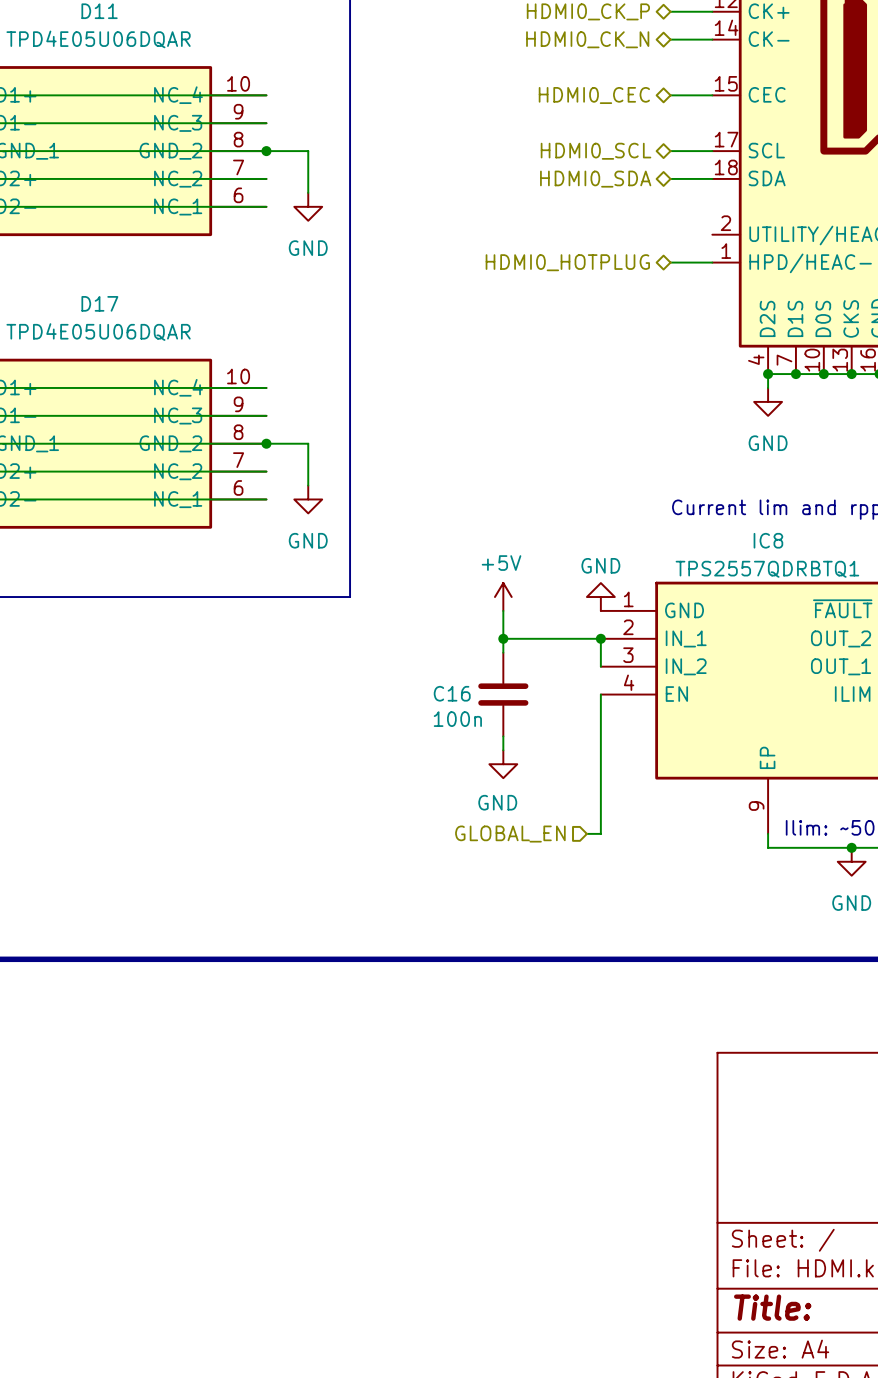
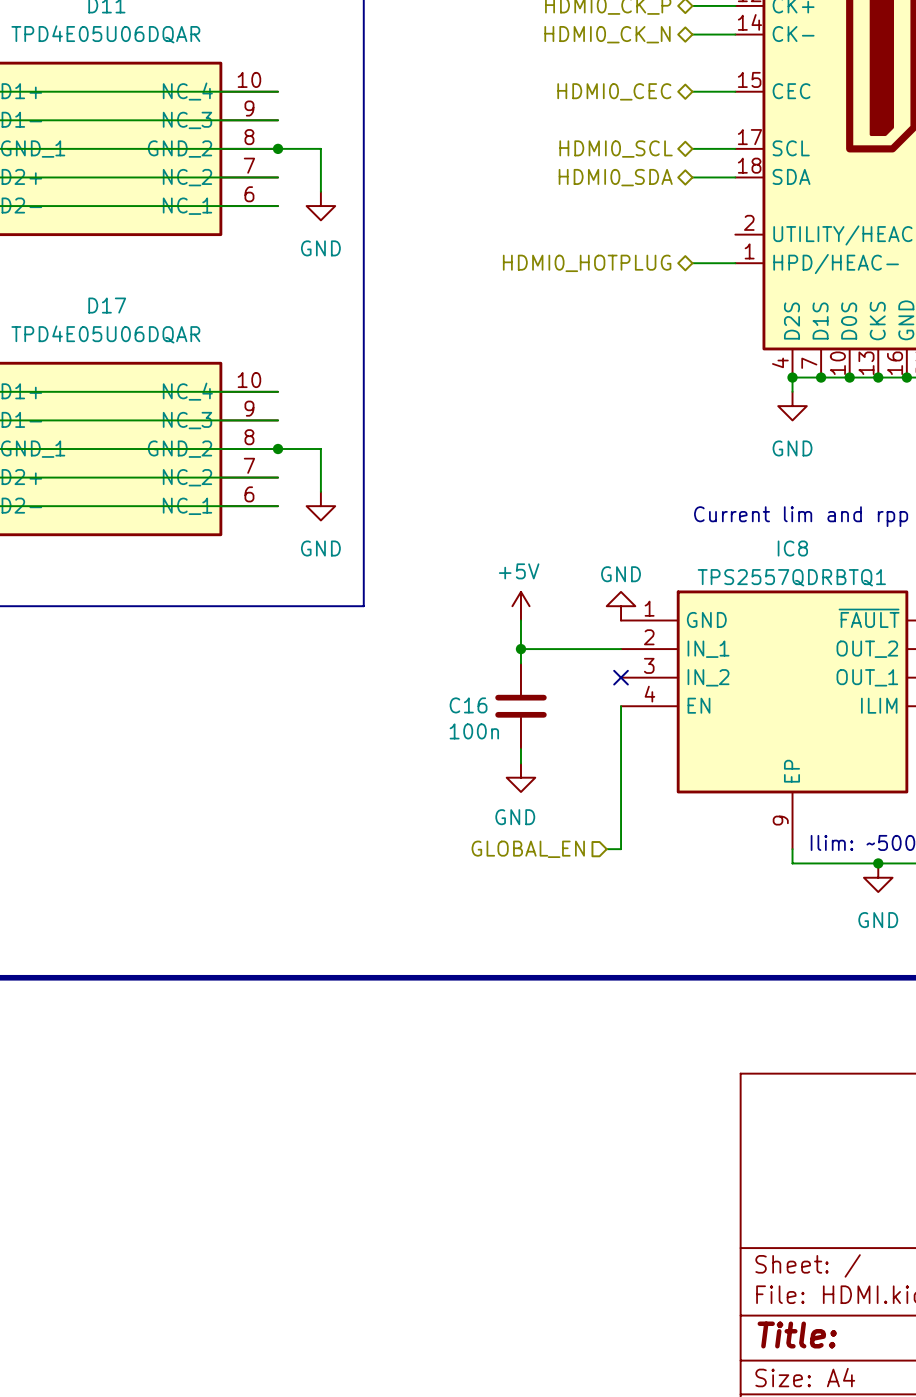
wire: (600, 638) (600, 666) -> none
junction: (600, 638) -> none
no-connect mark: none -> (621, 677)

